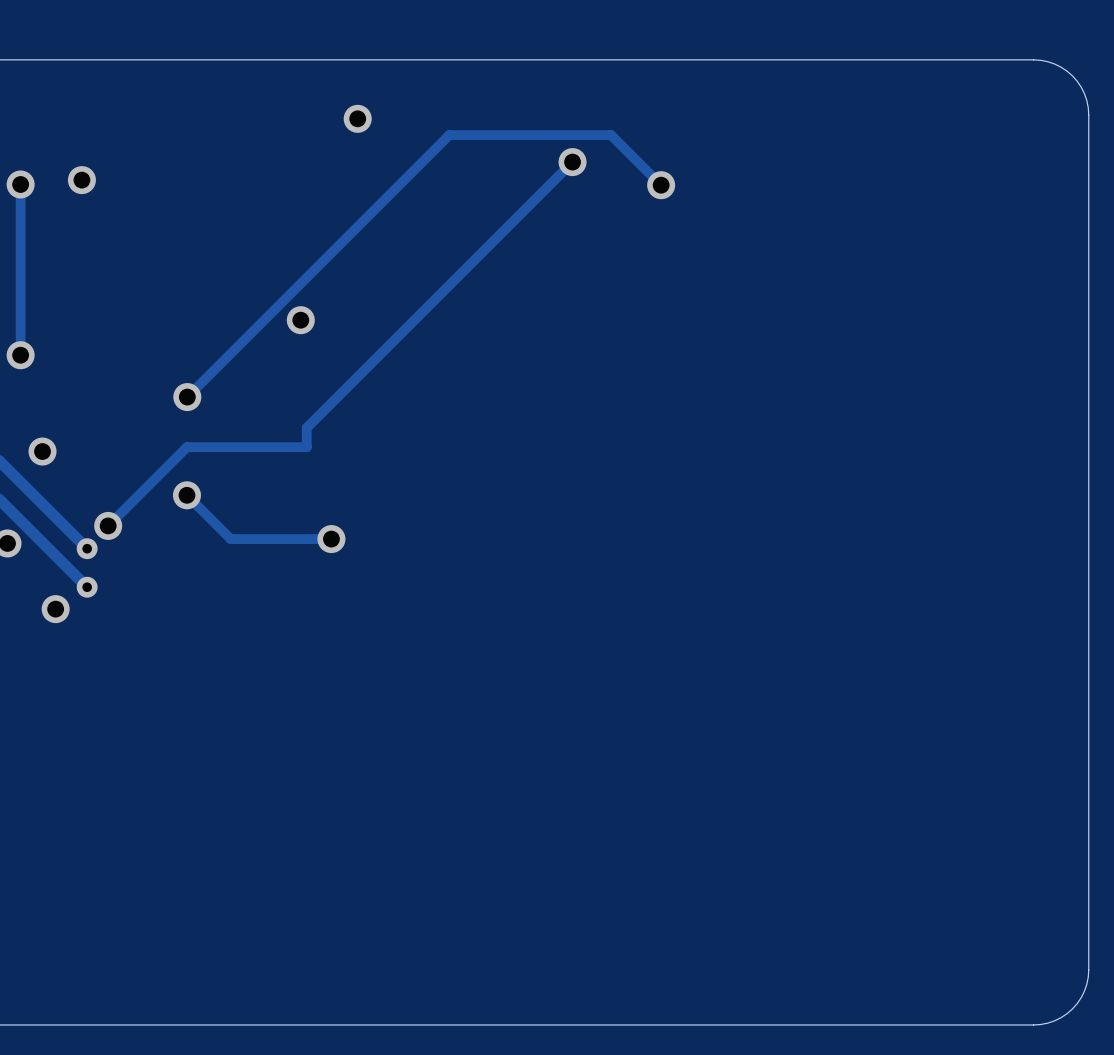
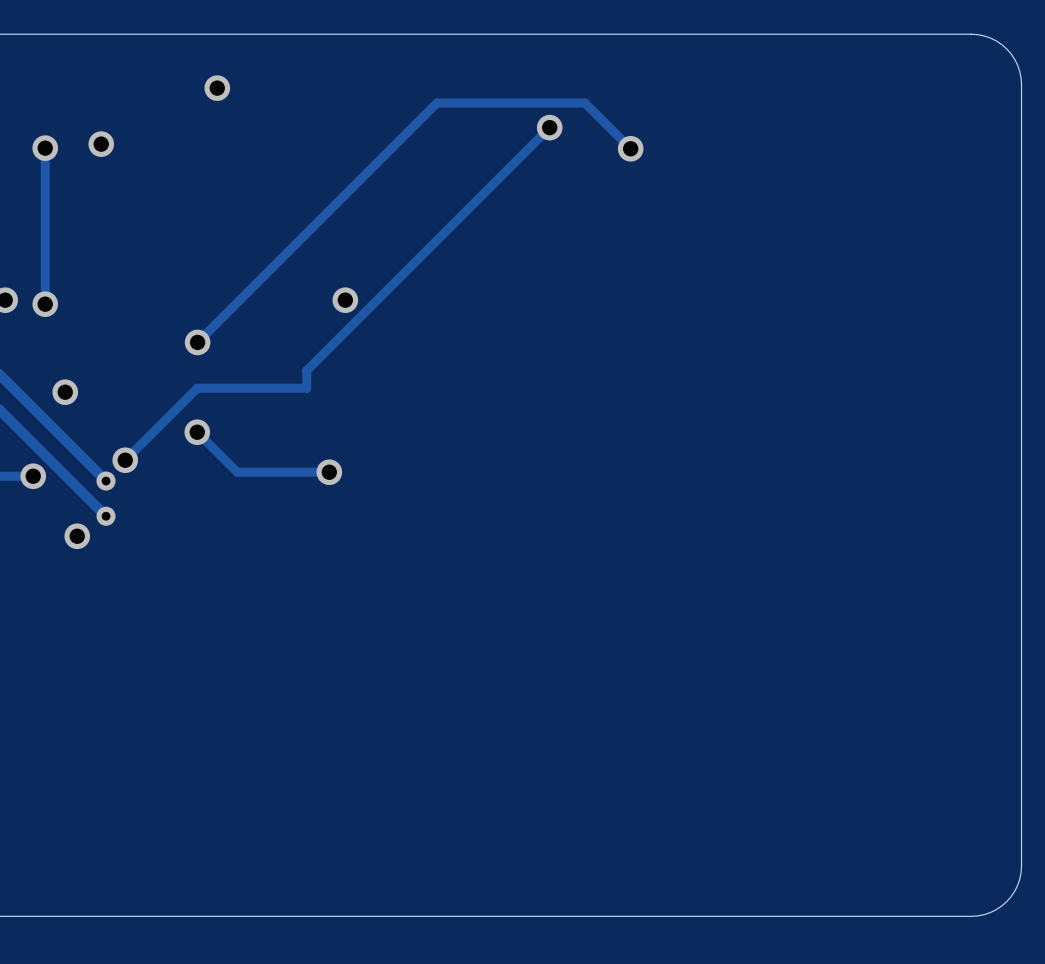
via: none -> (217, 88)
via: (357, 118) -> none
via position: (300, 320) -> (345, 300)

